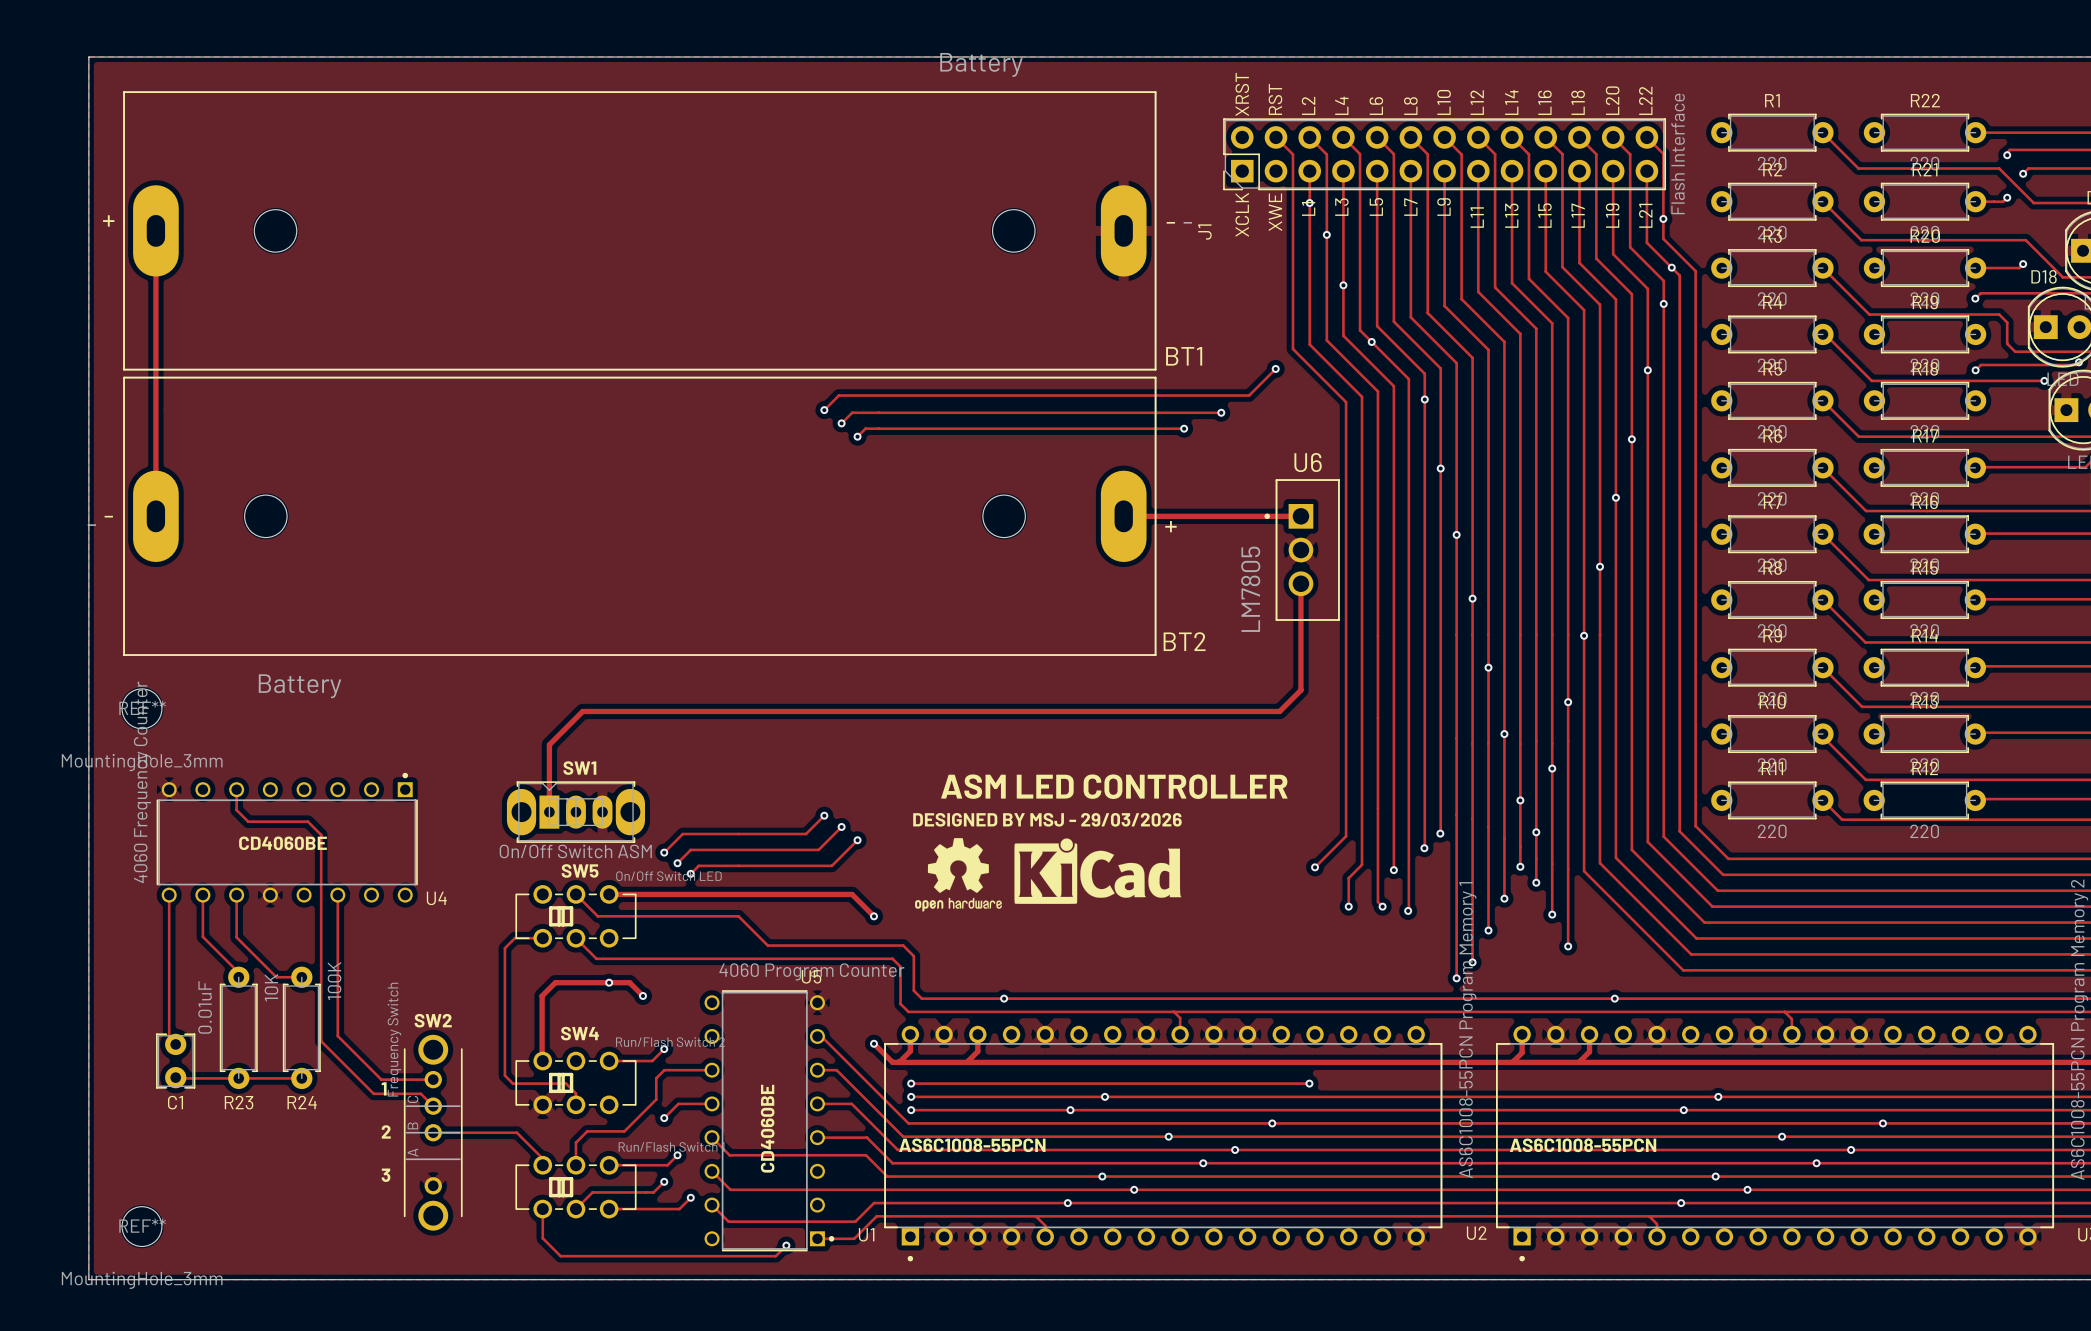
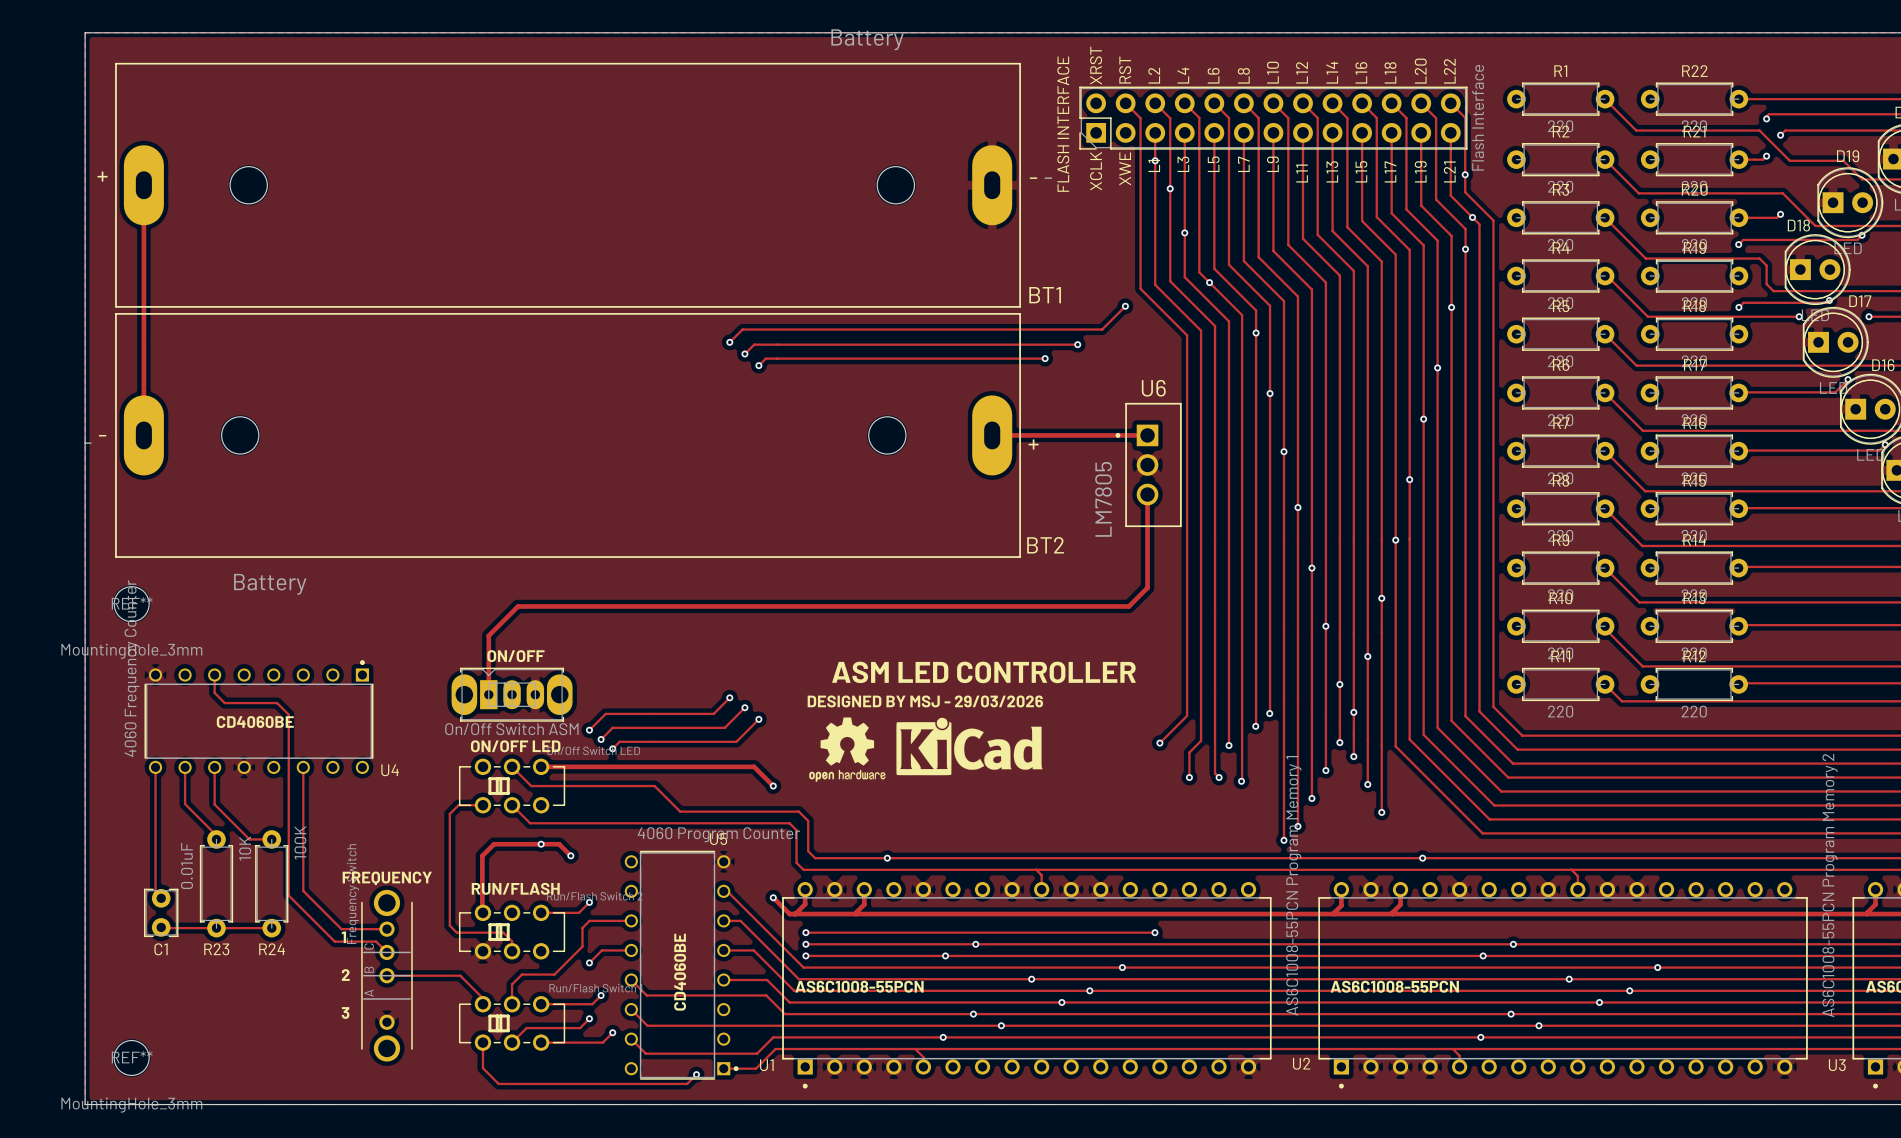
J1 name: J1 (1204, 232) -> FLASH INTERFACE (1063, 124)
SW1 name: SW1 (579, 768) -> ON/OFF (515, 656)
SW5 name: SW5 (580, 870) -> ON/OFF LED (515, 746)
SW2 name: SW2 (433, 1020) -> FREQUENCY (387, 878)
SW4 name: SW4 (579, 1033) -> RUN/FLASH (515, 888)

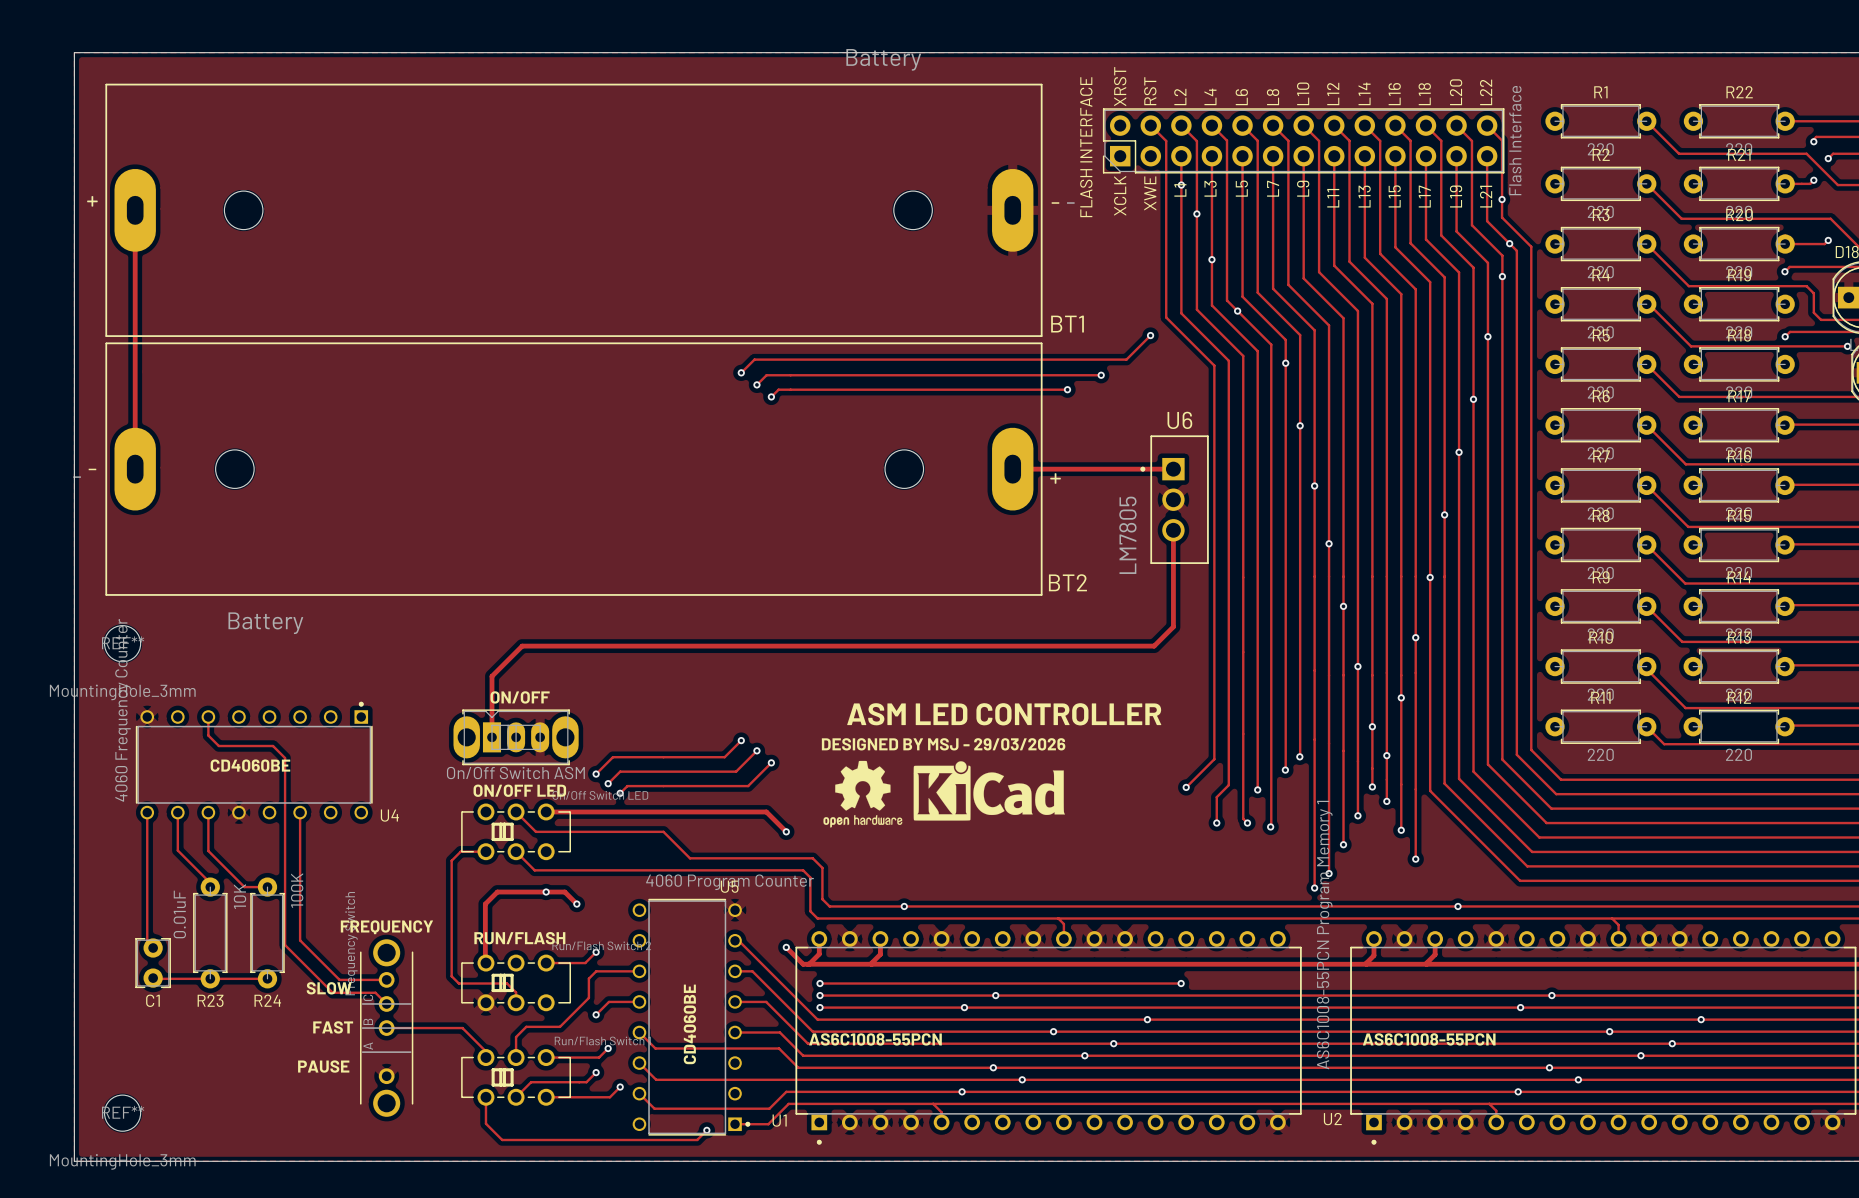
text: none -> SLOW (329, 988)
text: 1 (343, 937) -> none
text: none -> FAST (333, 1027)
text: 2 (345, 975) -> none
text: none -> PAUSE (323, 1066)
text: 3 (345, 1012) -> none

